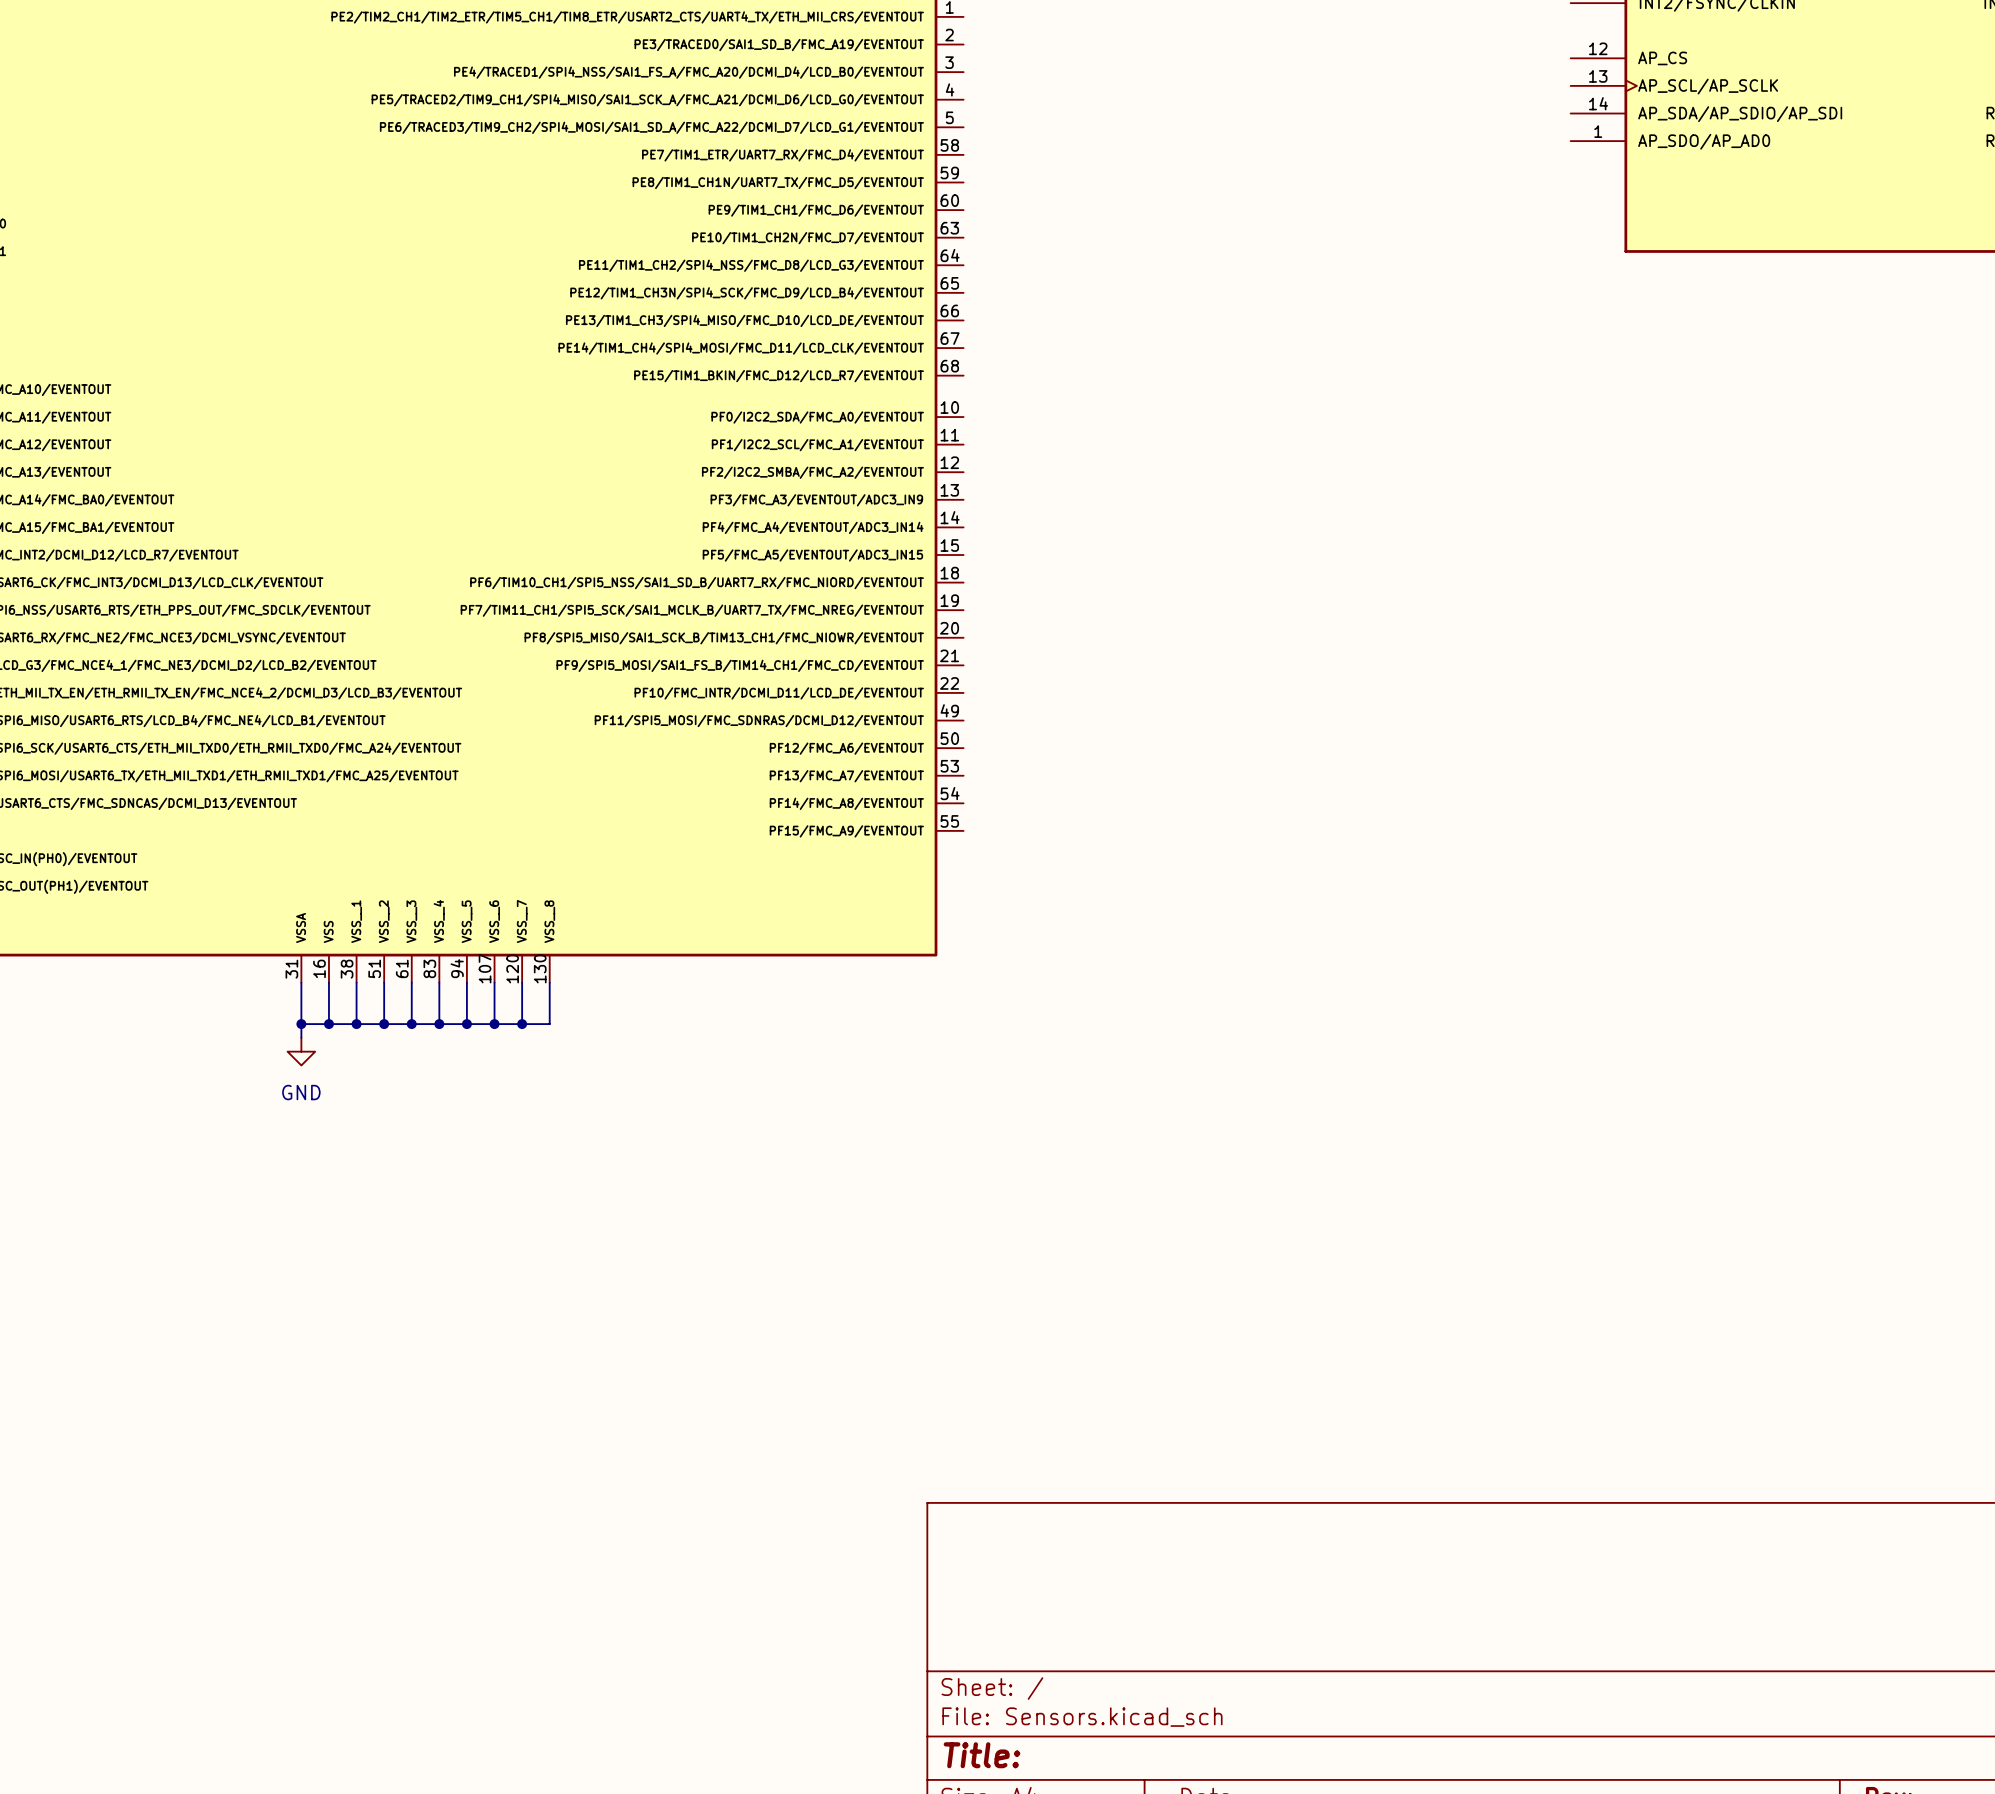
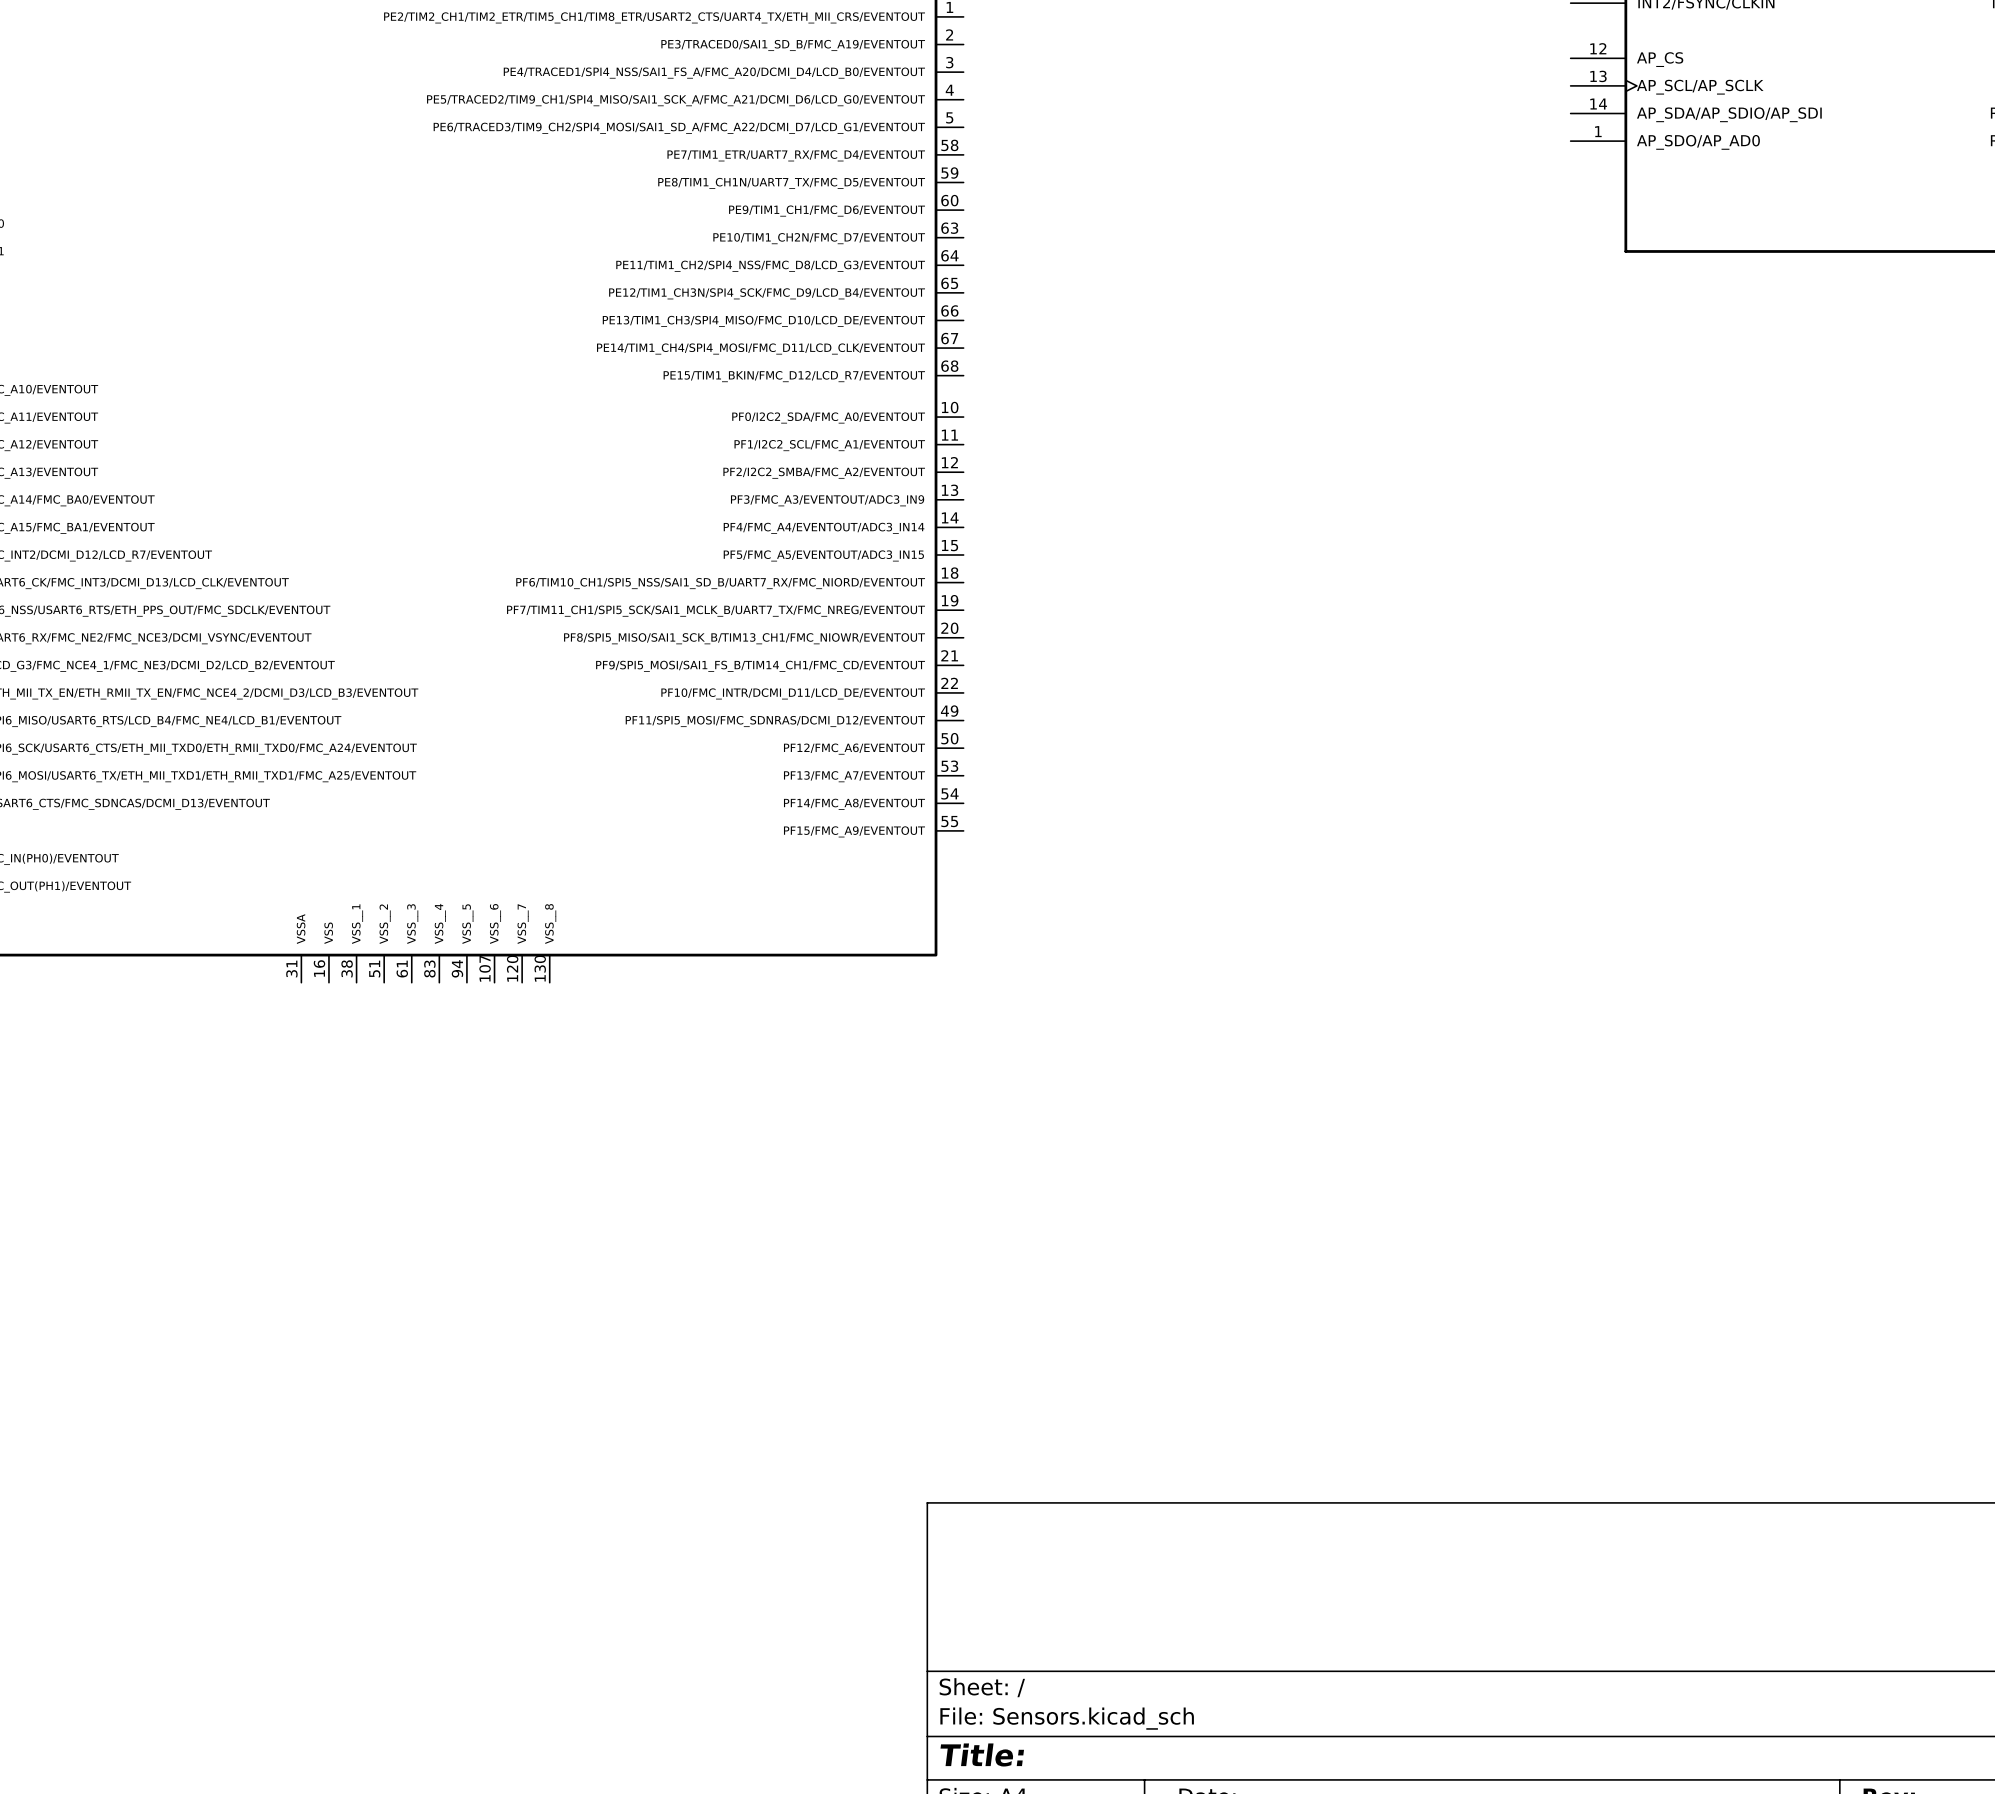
wire: (301, 982) (301, 1037) -> none
wire: (328, 982) (328, 1024) -> none
wire: (356, 982) (356, 1024) -> none
wire: (384, 982) (384, 1024) -> none
wire: (411, 982) (411, 1024) -> none
wire: (439, 982) (439, 1024) -> none
wire: (466, 982) (466, 1024) -> none
wire: (494, 982) (494, 1024) -> none
wire: (522, 982) (522, 1024) -> none
wire: (549, 982) (549, 1024) (301, 1024) -> none
junction: (301, 1024) -> none
junction: (328, 1024) -> none
junction: (356, 1024) -> none
junction: (384, 1024) -> none
junction: (411, 1024) -> none
junction: (439, 1024) -> none
junction: (466, 1024) -> none
junction: (494, 1024) -> none
junction: (522, 1024) -> none
power symbol: GND (301, 1051) -> none

